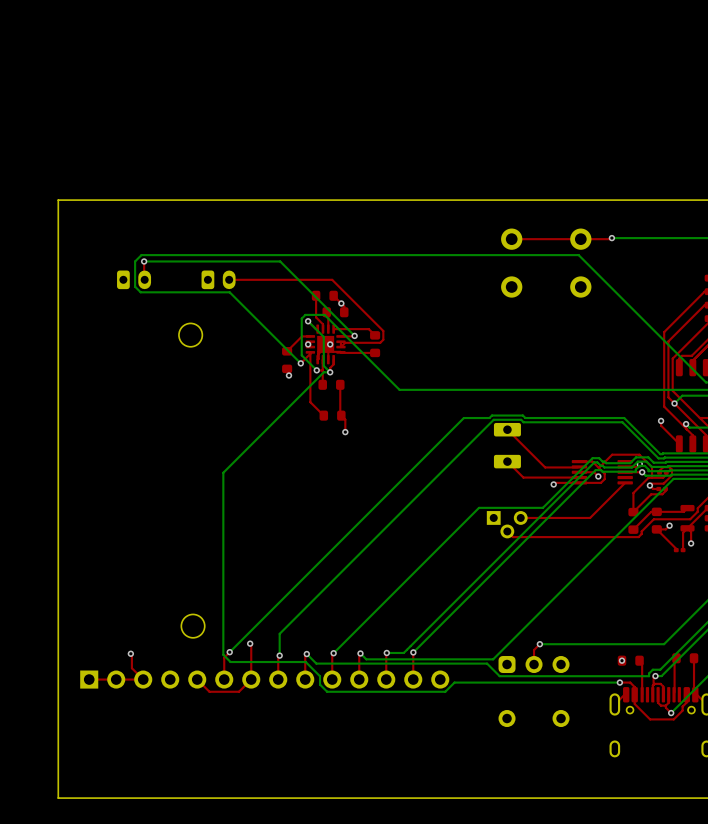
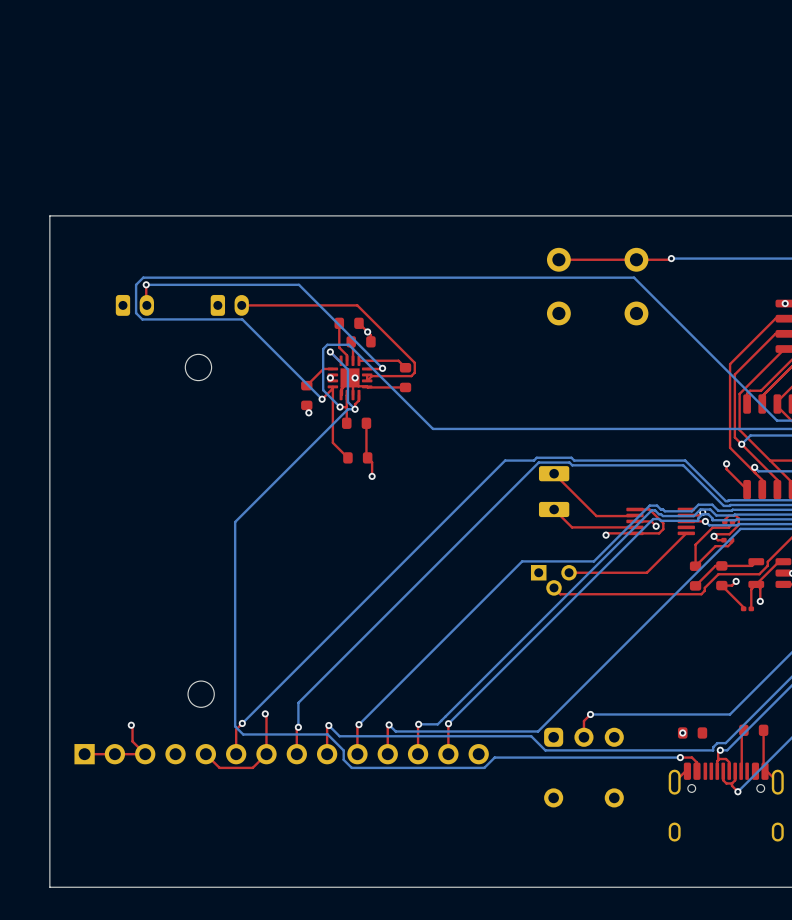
top track: (598, 468) (612, 454) (639, 454) (652, 467) (652, 477) -> none
top track: (639, 660) (642, 663) (642, 694) -> none
top track: (686, 694) (686, 702) (682, 706) (682, 710) (673, 719) (650, 719) (634, 704) (634, 694) -> none

